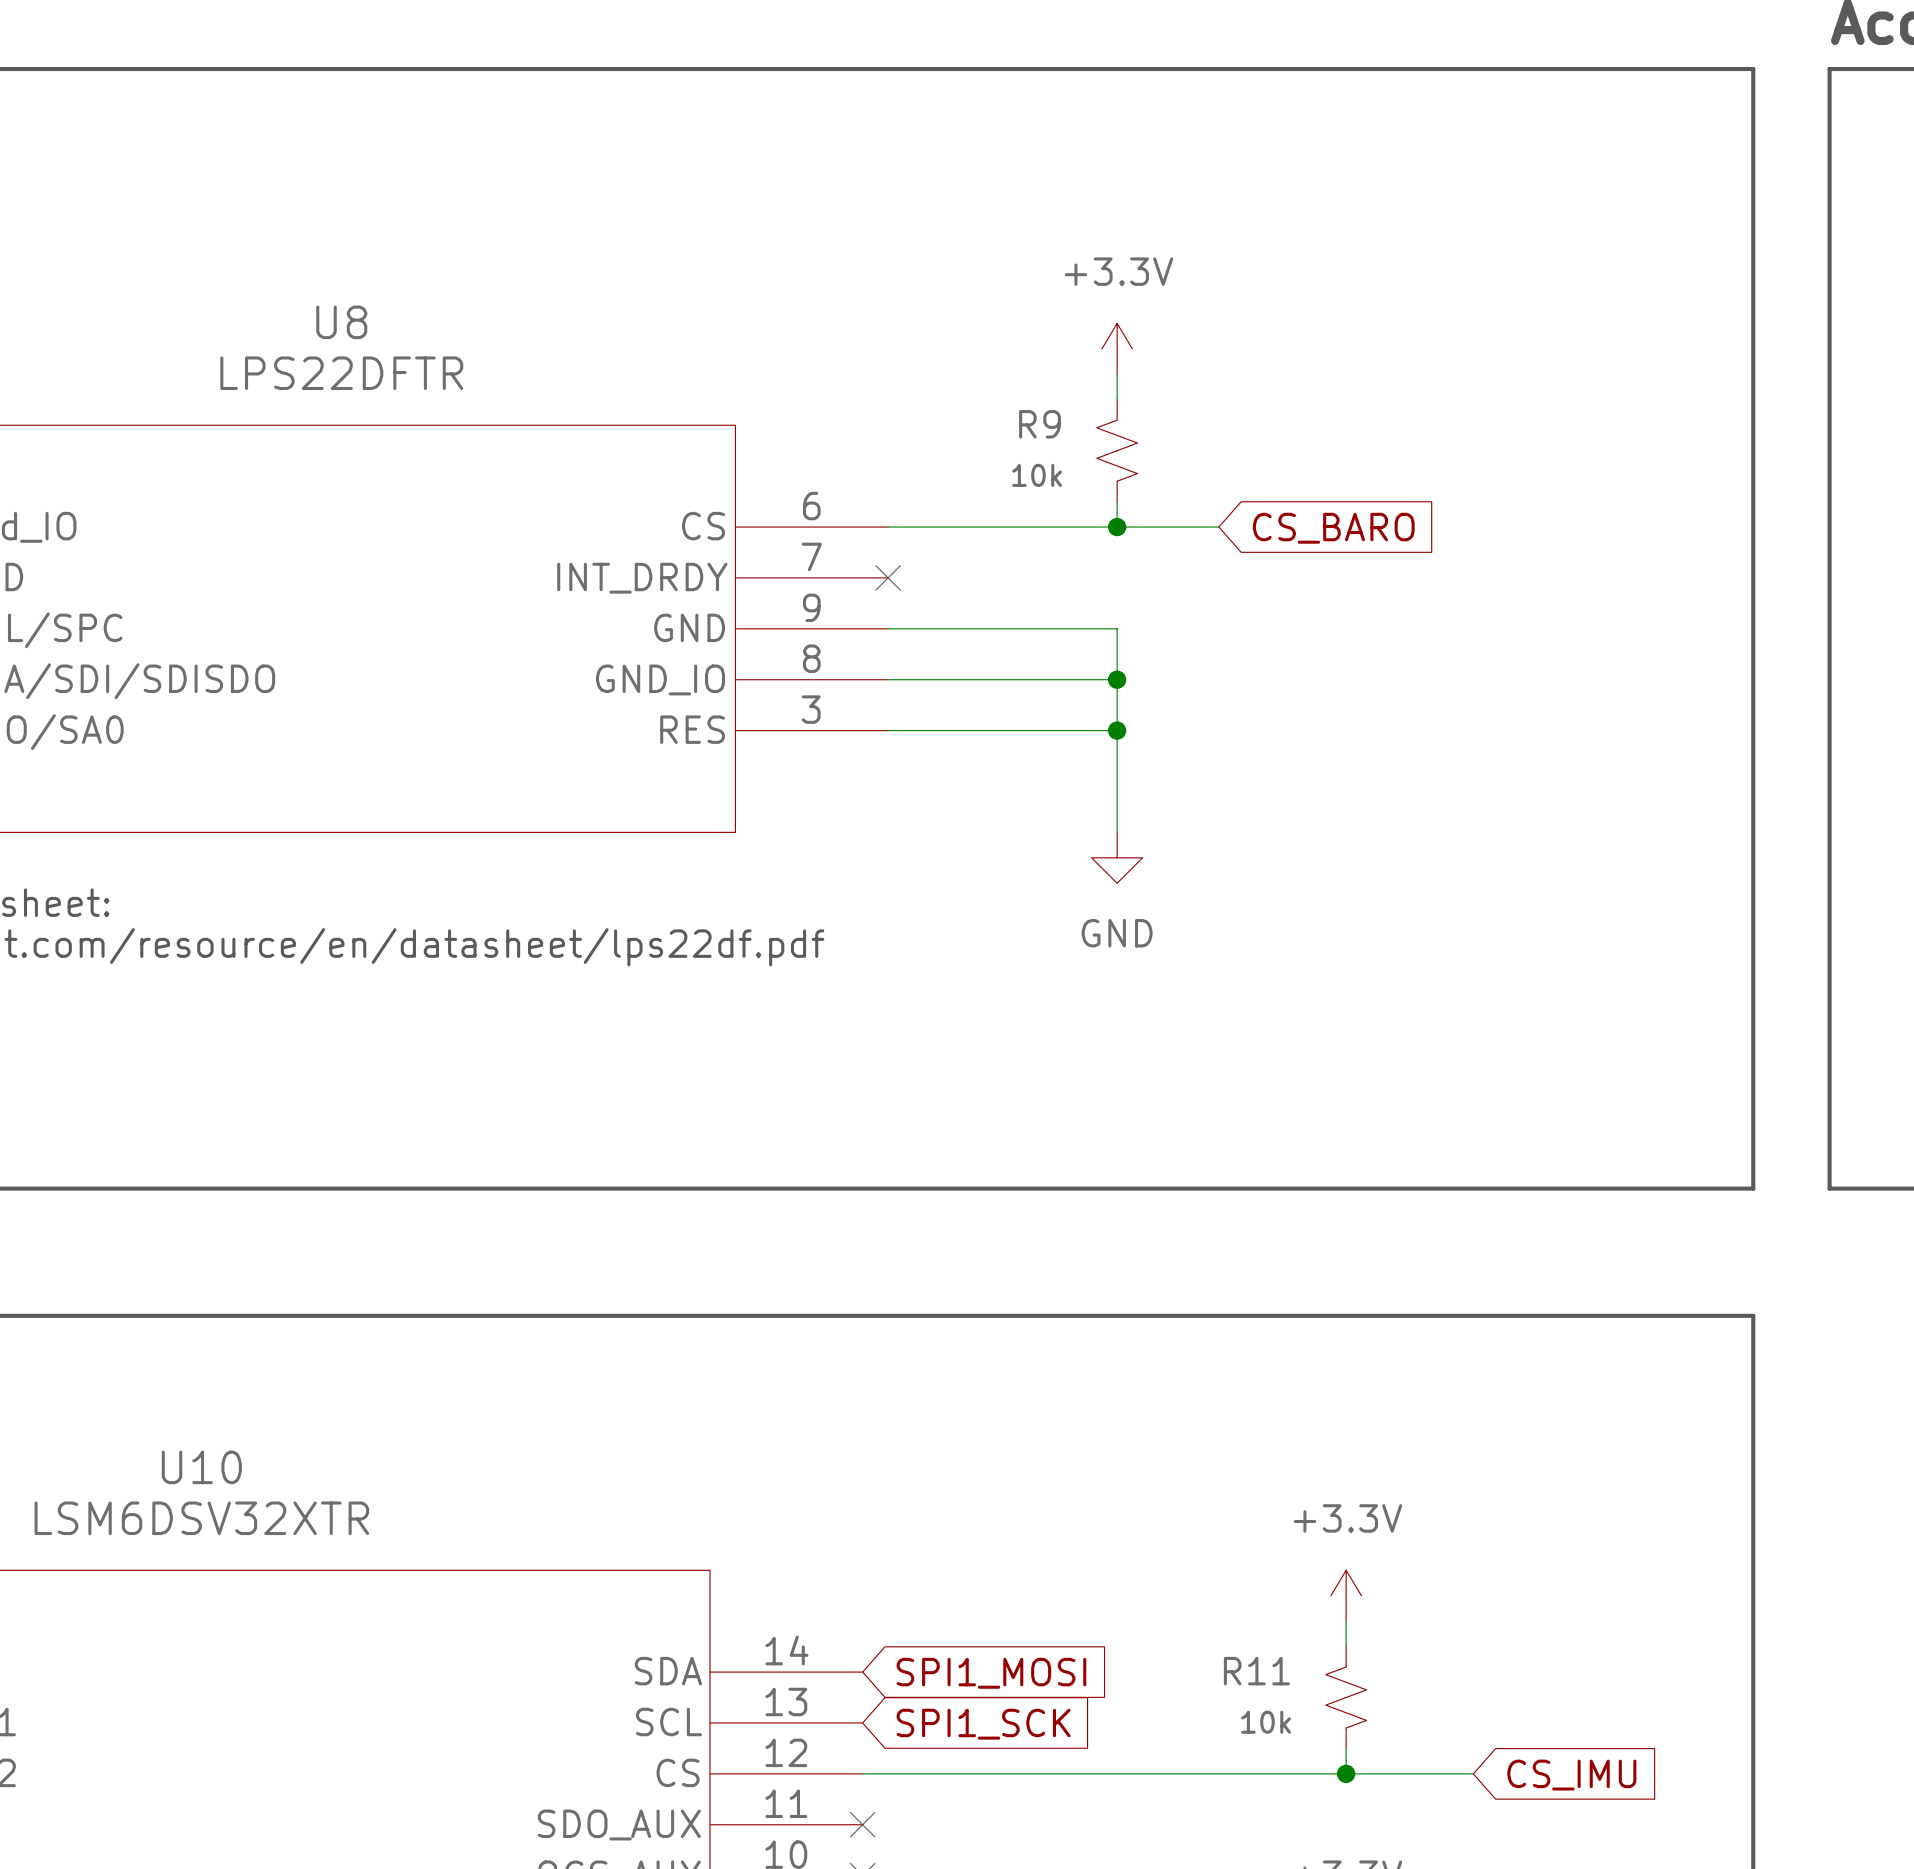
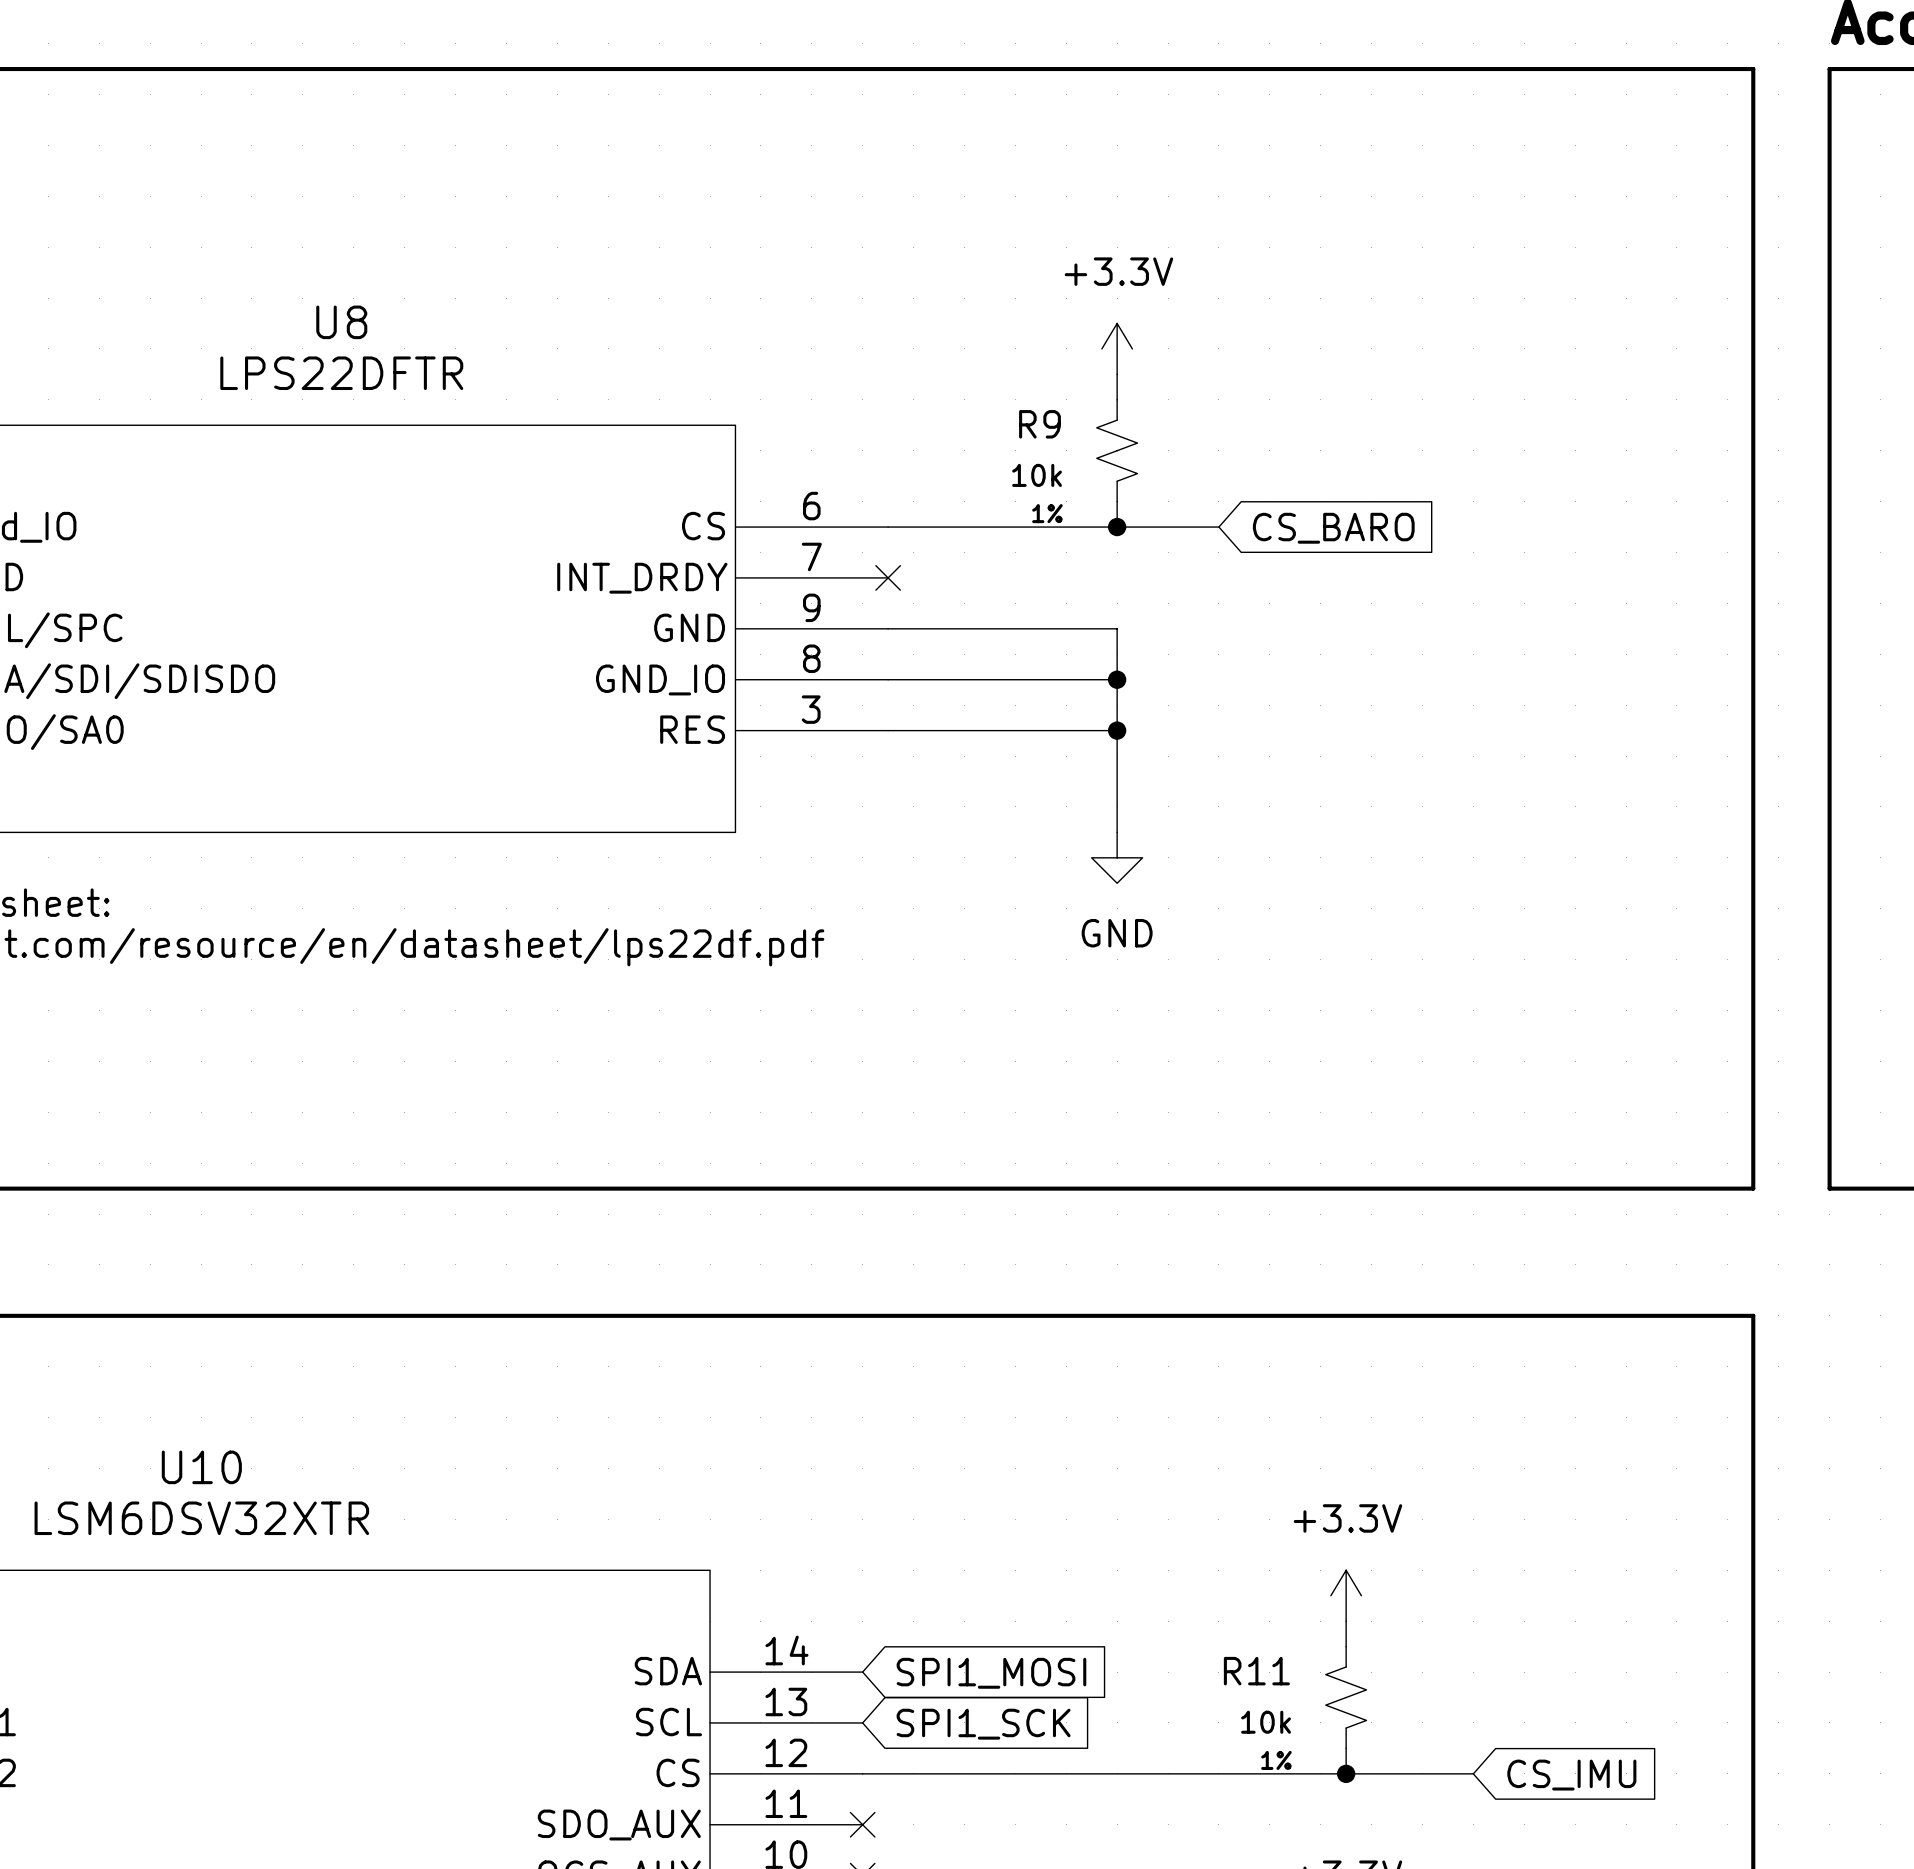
R9 text: none -> 1% (1047, 513)
R11 text: none -> 1% (1276, 1760)

